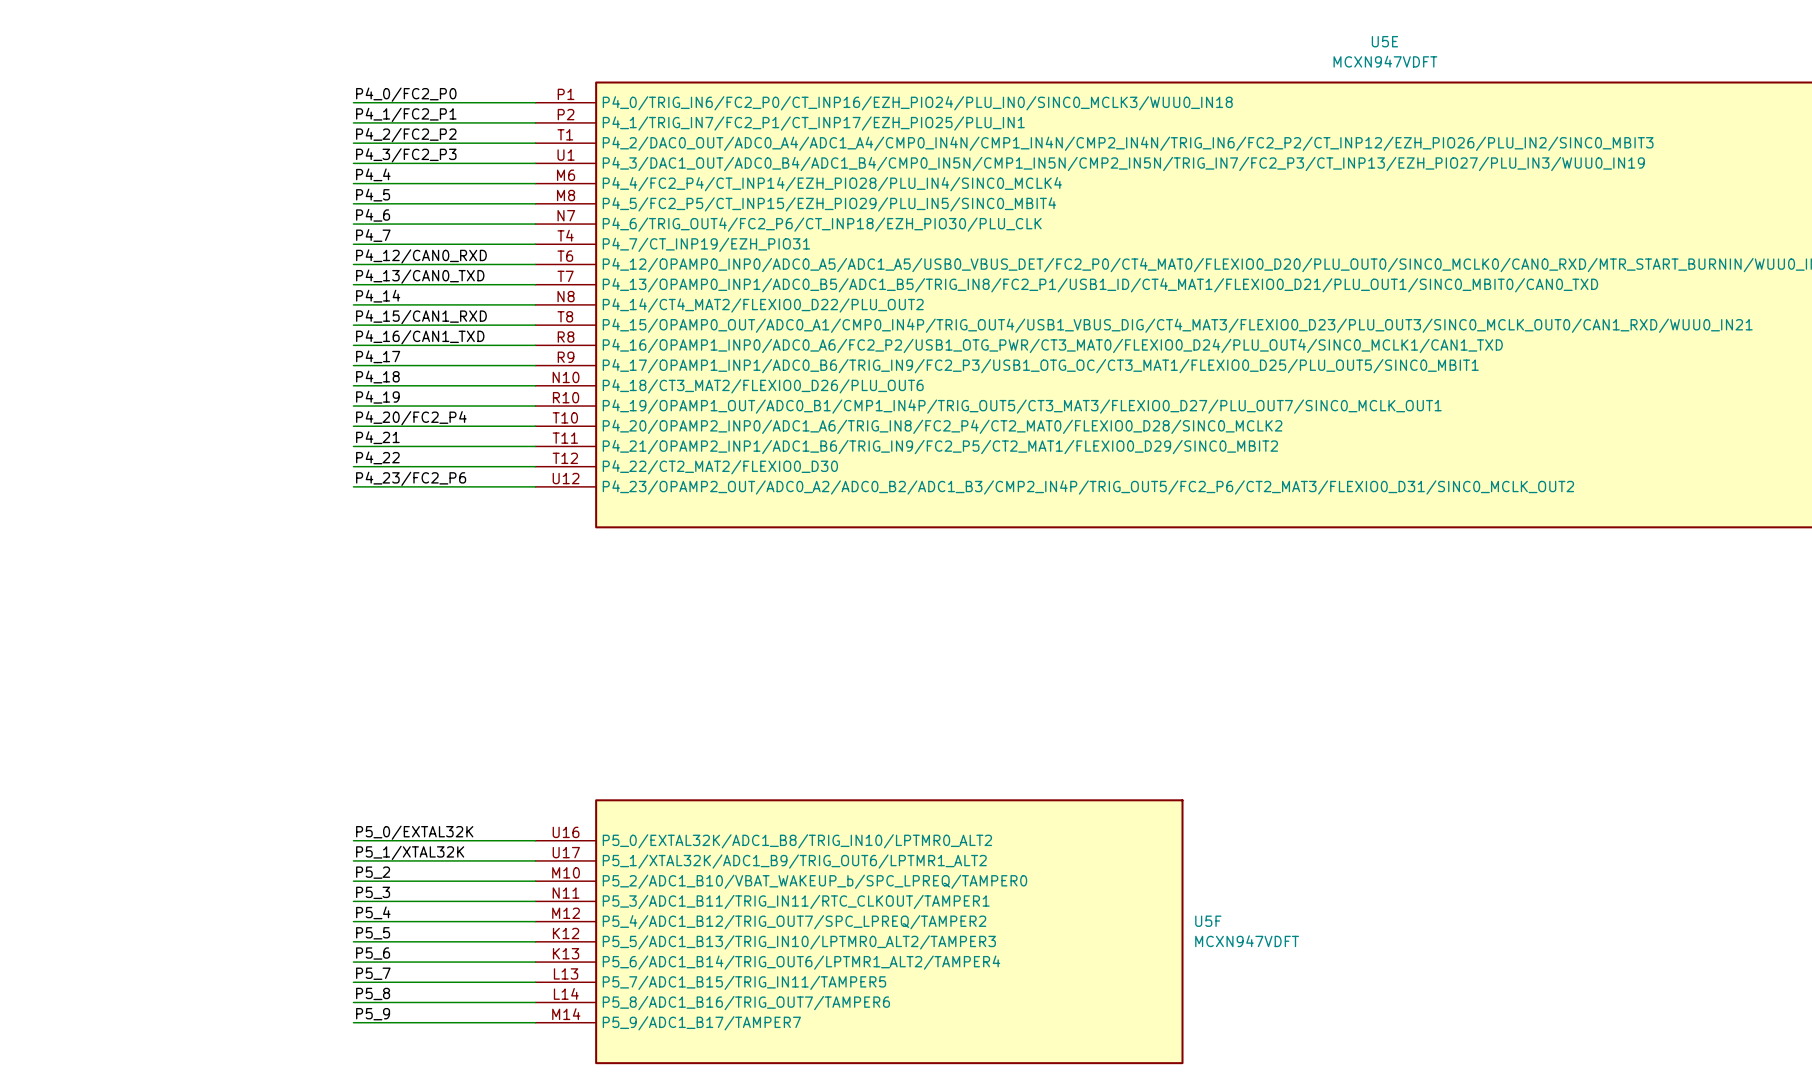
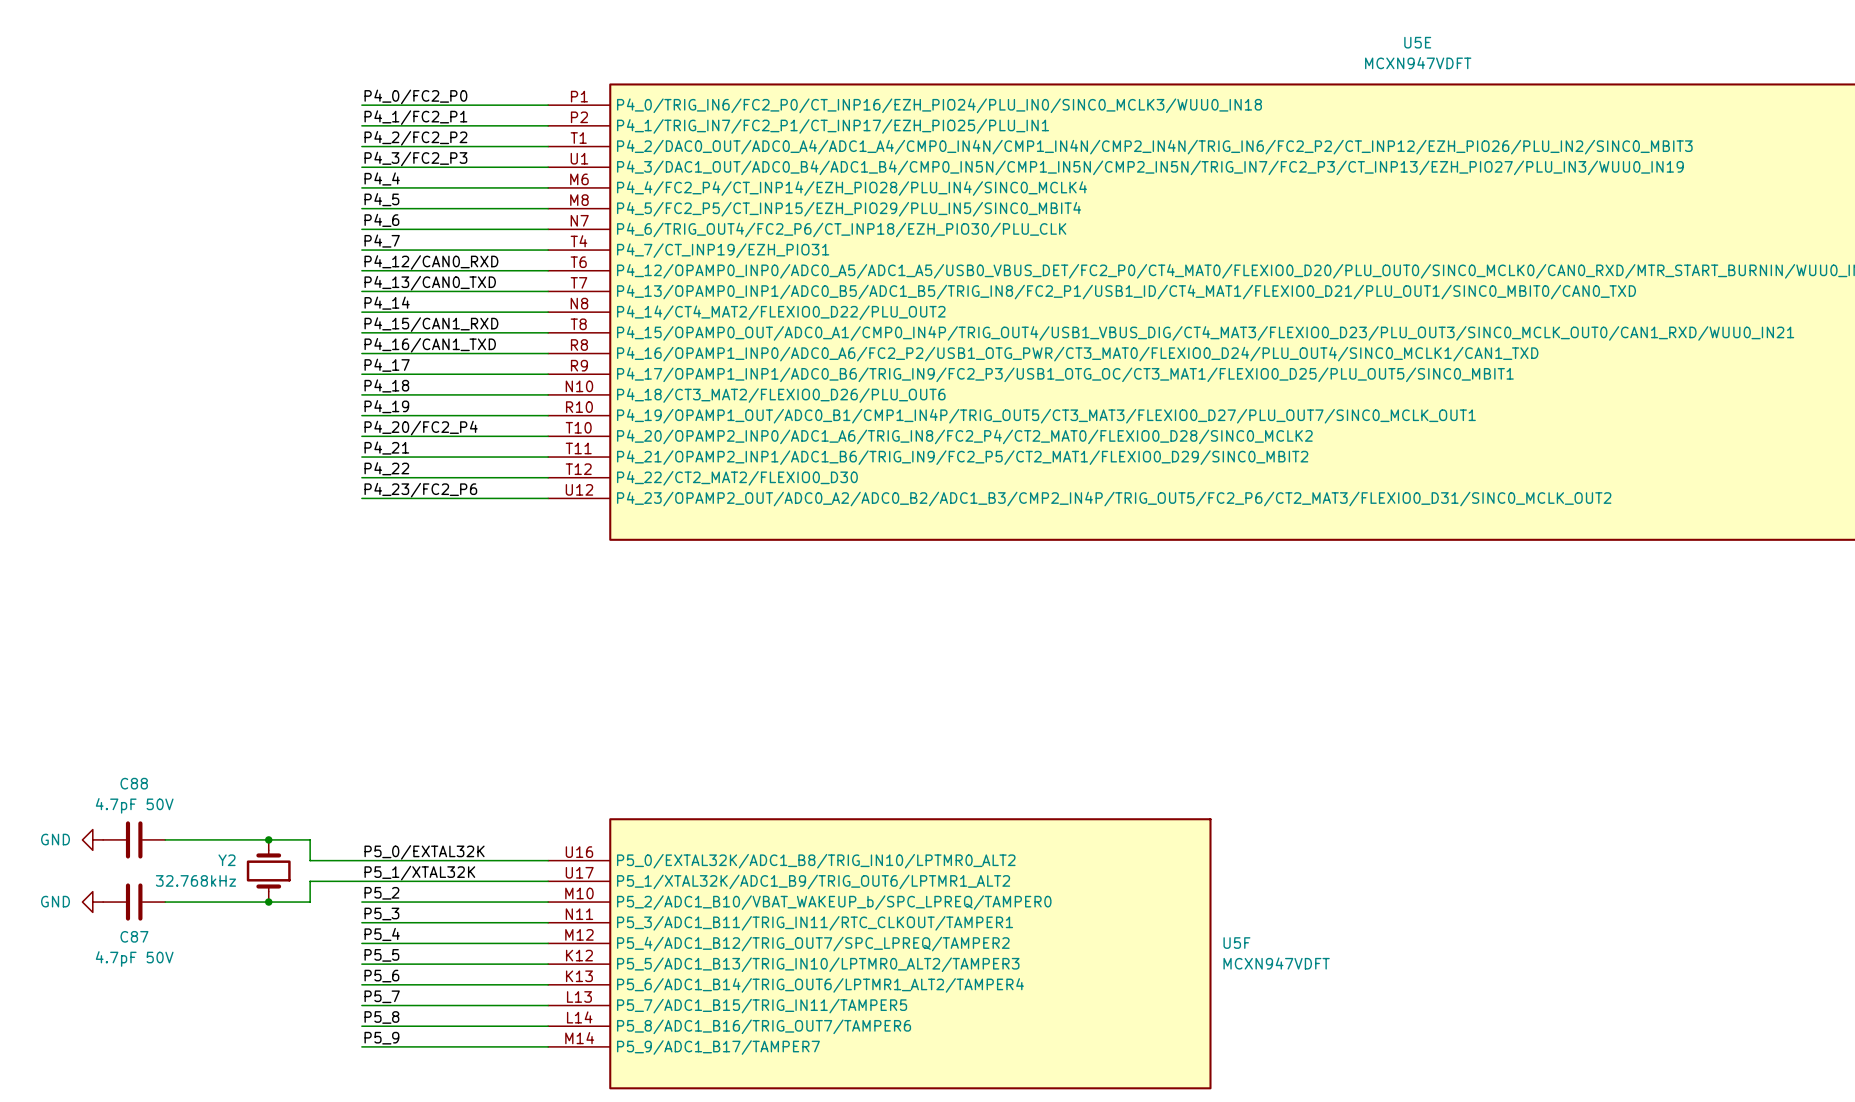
power symbol: none -> GND (92, 839)
C88: none -> 4.7pF 50V (134, 839)
wire: none -> (165, 839) (310, 839) (310, 860) (361, 860)
junction: none -> (268, 839)
Y2: none -> 32.768kHz (268, 870)
wire: none -> (361, 881) (310, 881) (310, 902) (165, 902)
power symbol: none -> GND (92, 902)
C87: none -> 4.7pF 50V (134, 902)
junction: none -> (268, 902)

